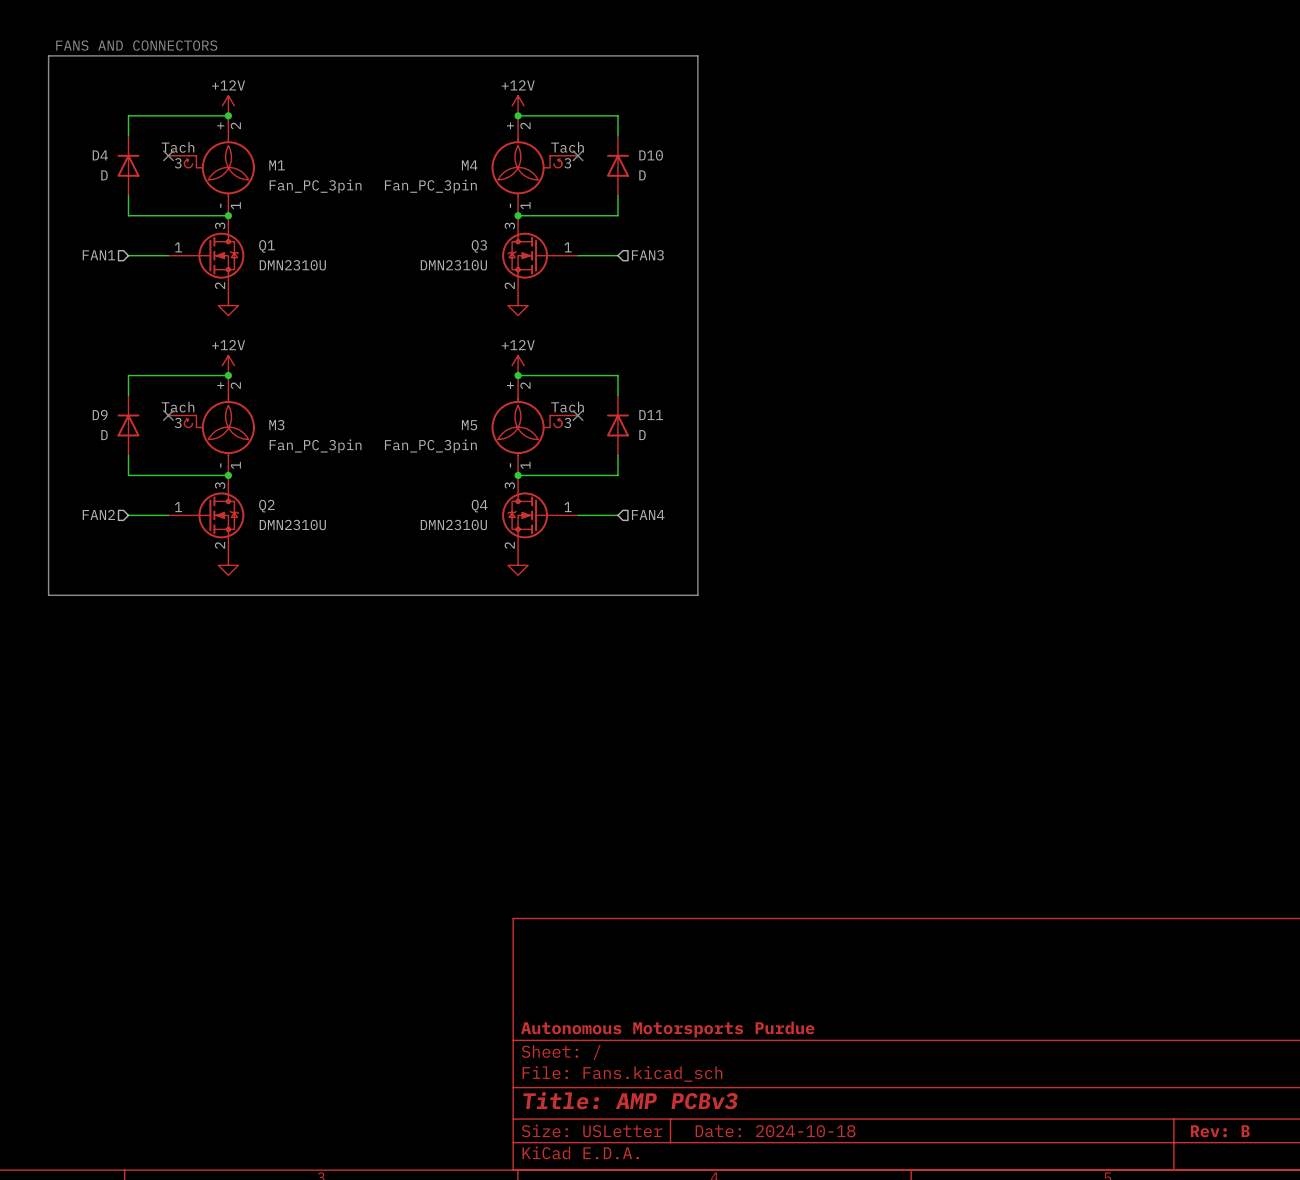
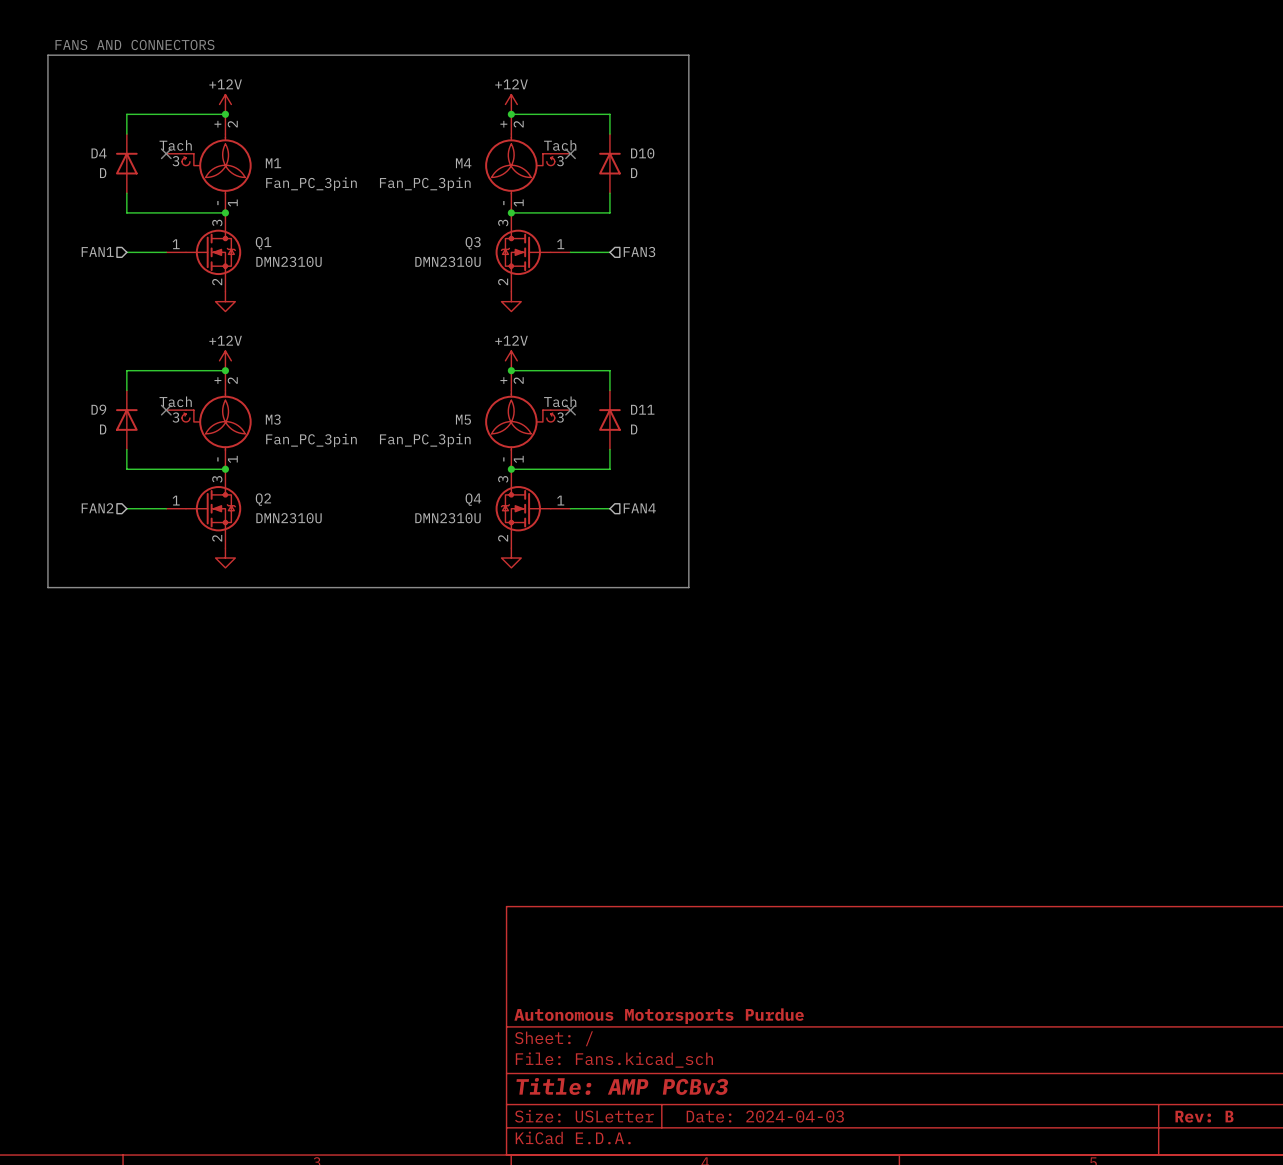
title block: Date: 2024-10-18 (775, 1131) -> Date: 2024-04-03 (765, 1116)

